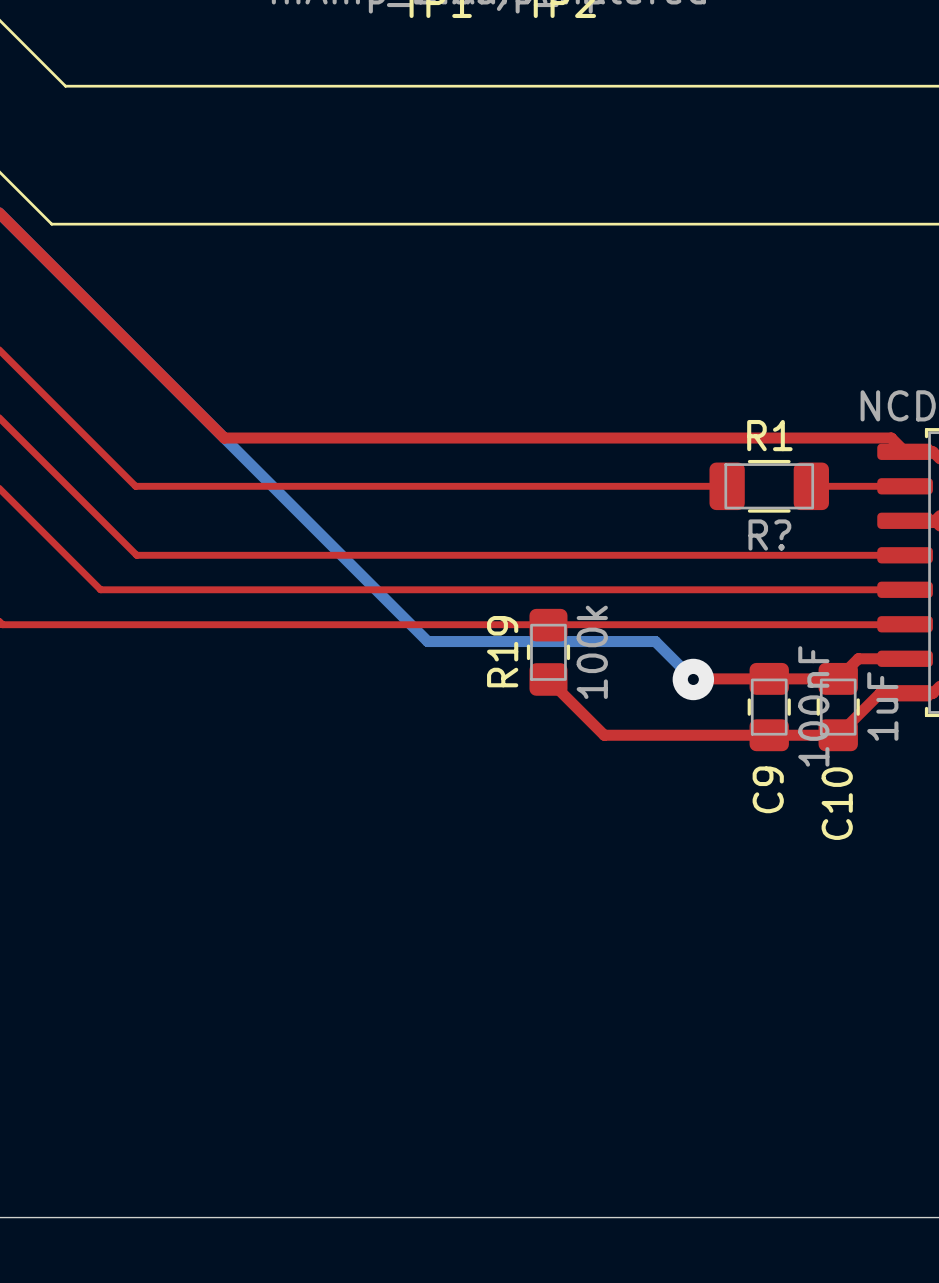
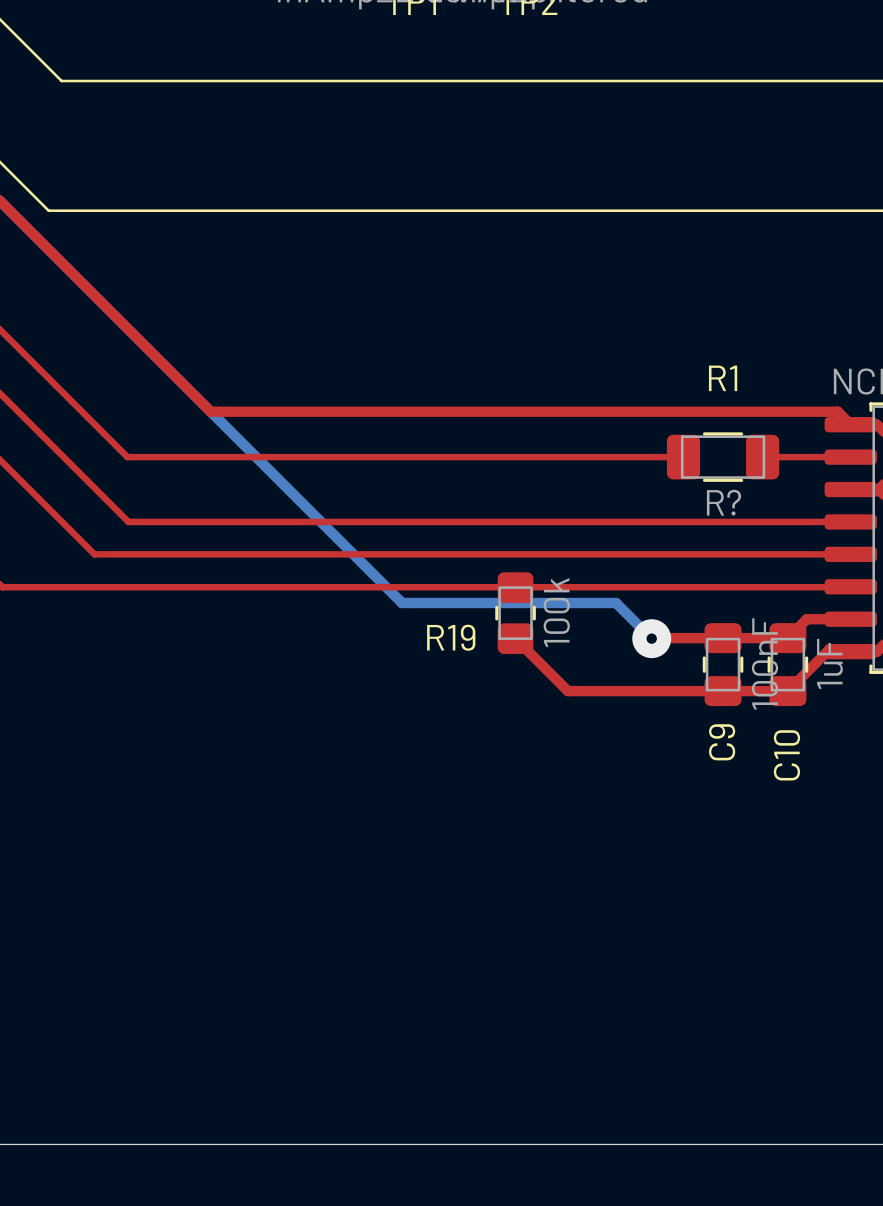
R1 name position: R1 (769, 435) -> R1 (723, 378)
R19 name rotation: 0° (502, 651) -> 90° clockwise (451, 637)

